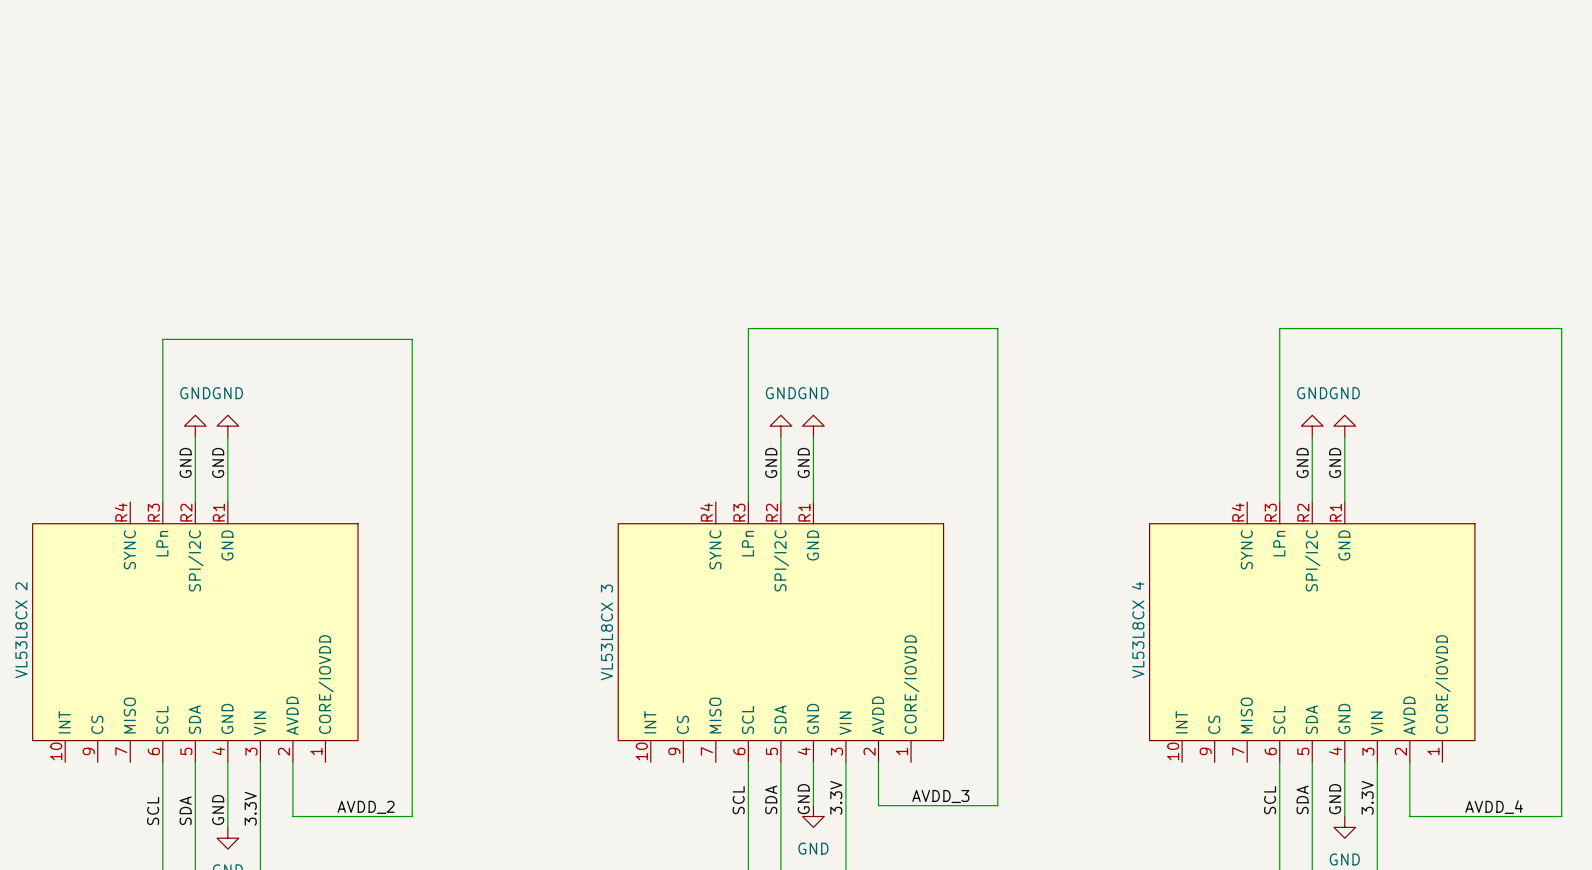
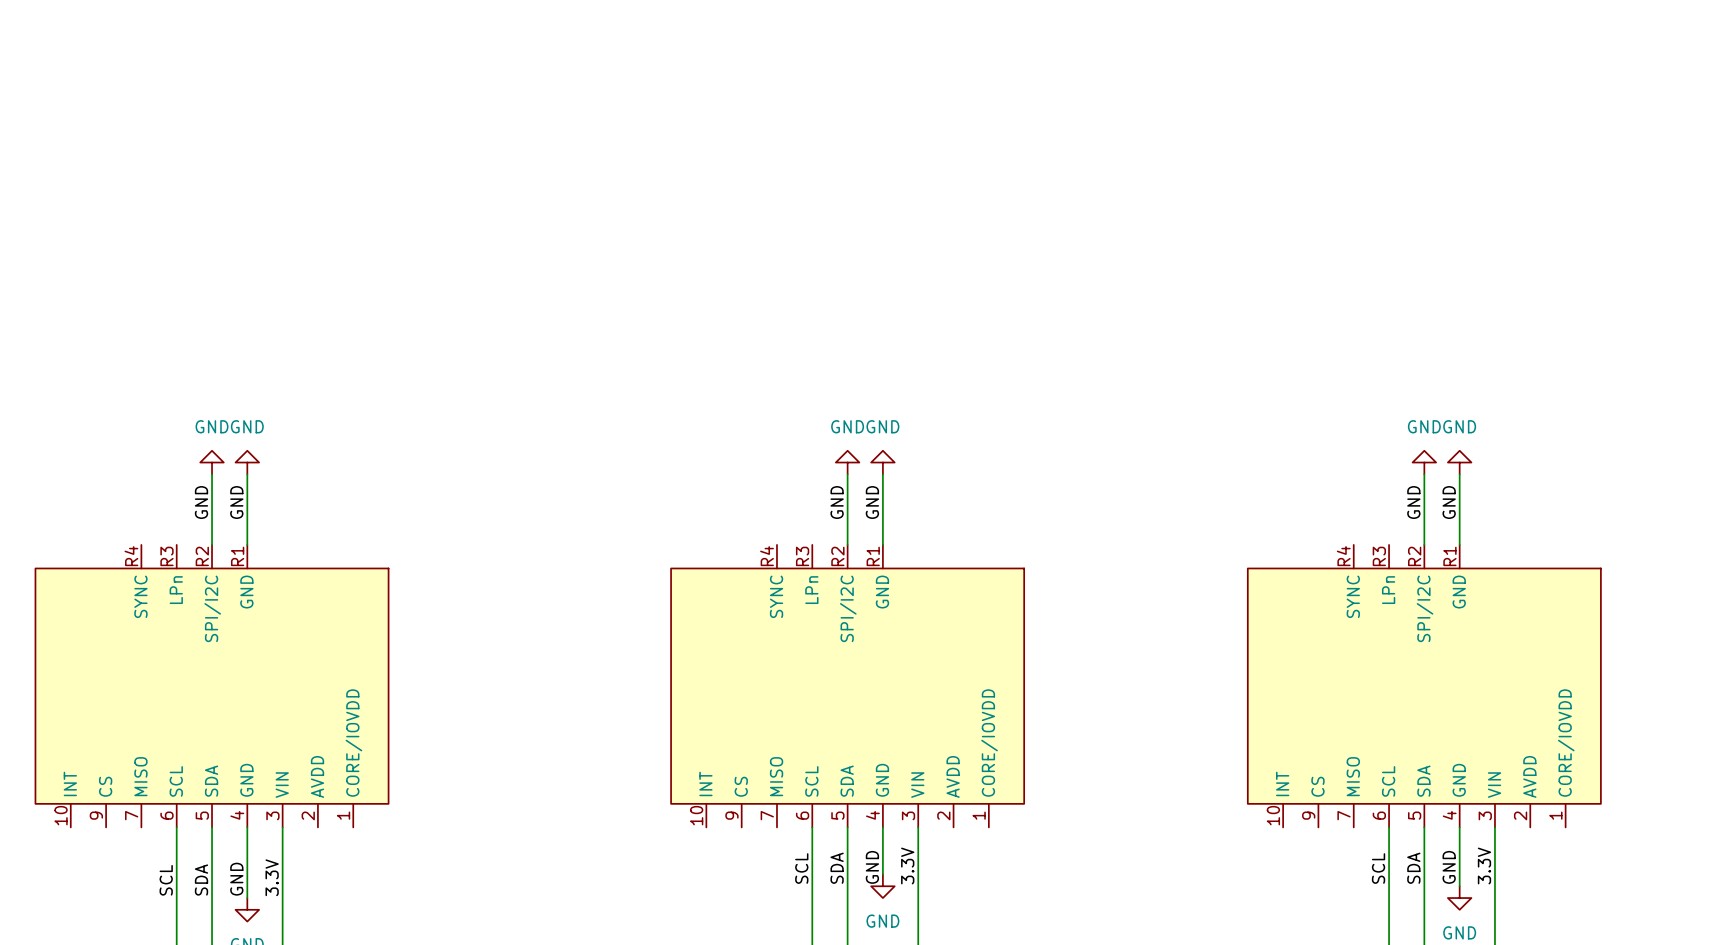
wire: (162, 502) (162, 339) (412, 339) (412, 816) (292, 816) (292, 762) -> none
wire: (748, 502) (748, 328) (997, 328) (997, 805) (878, 805) (878, 762) -> none
wire: (1279, 502) (1279, 328) (1561, 328) (1561, 816) (1409, 816) (1409, 762) -> none
part value: VL53L8CX 2 (21, 630) -> none
part value: VL53L8CX 4 (1138, 630) -> none
part value: VL53L8CX 3 (606, 632) -> none
label: AVDD_3 (940, 796) -> none
label: AVDD_2 (366, 807) -> none
label: AVDD_4 (1494, 807) -> none

